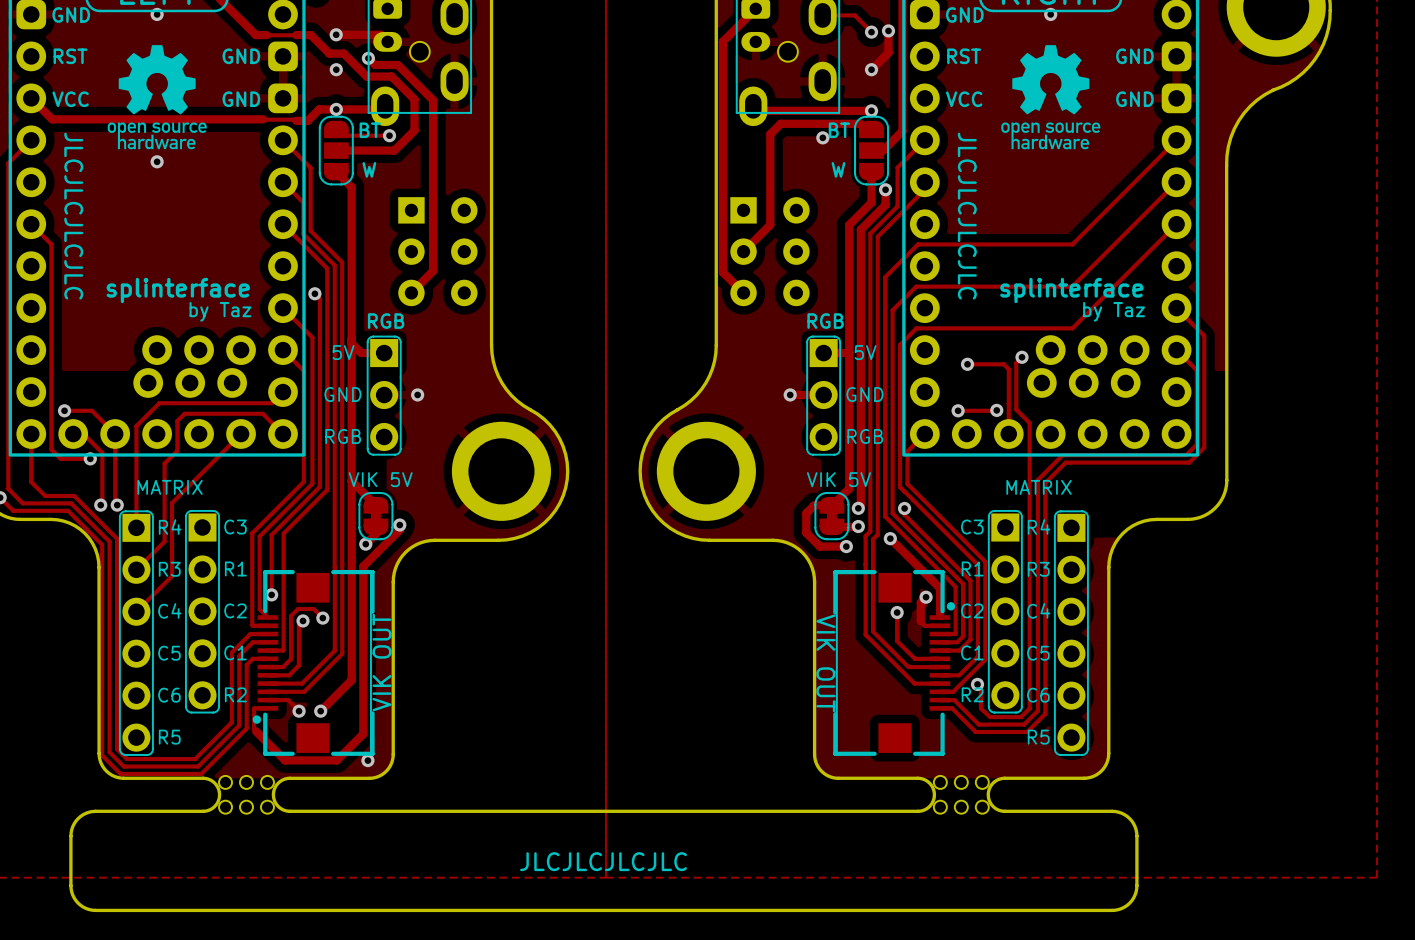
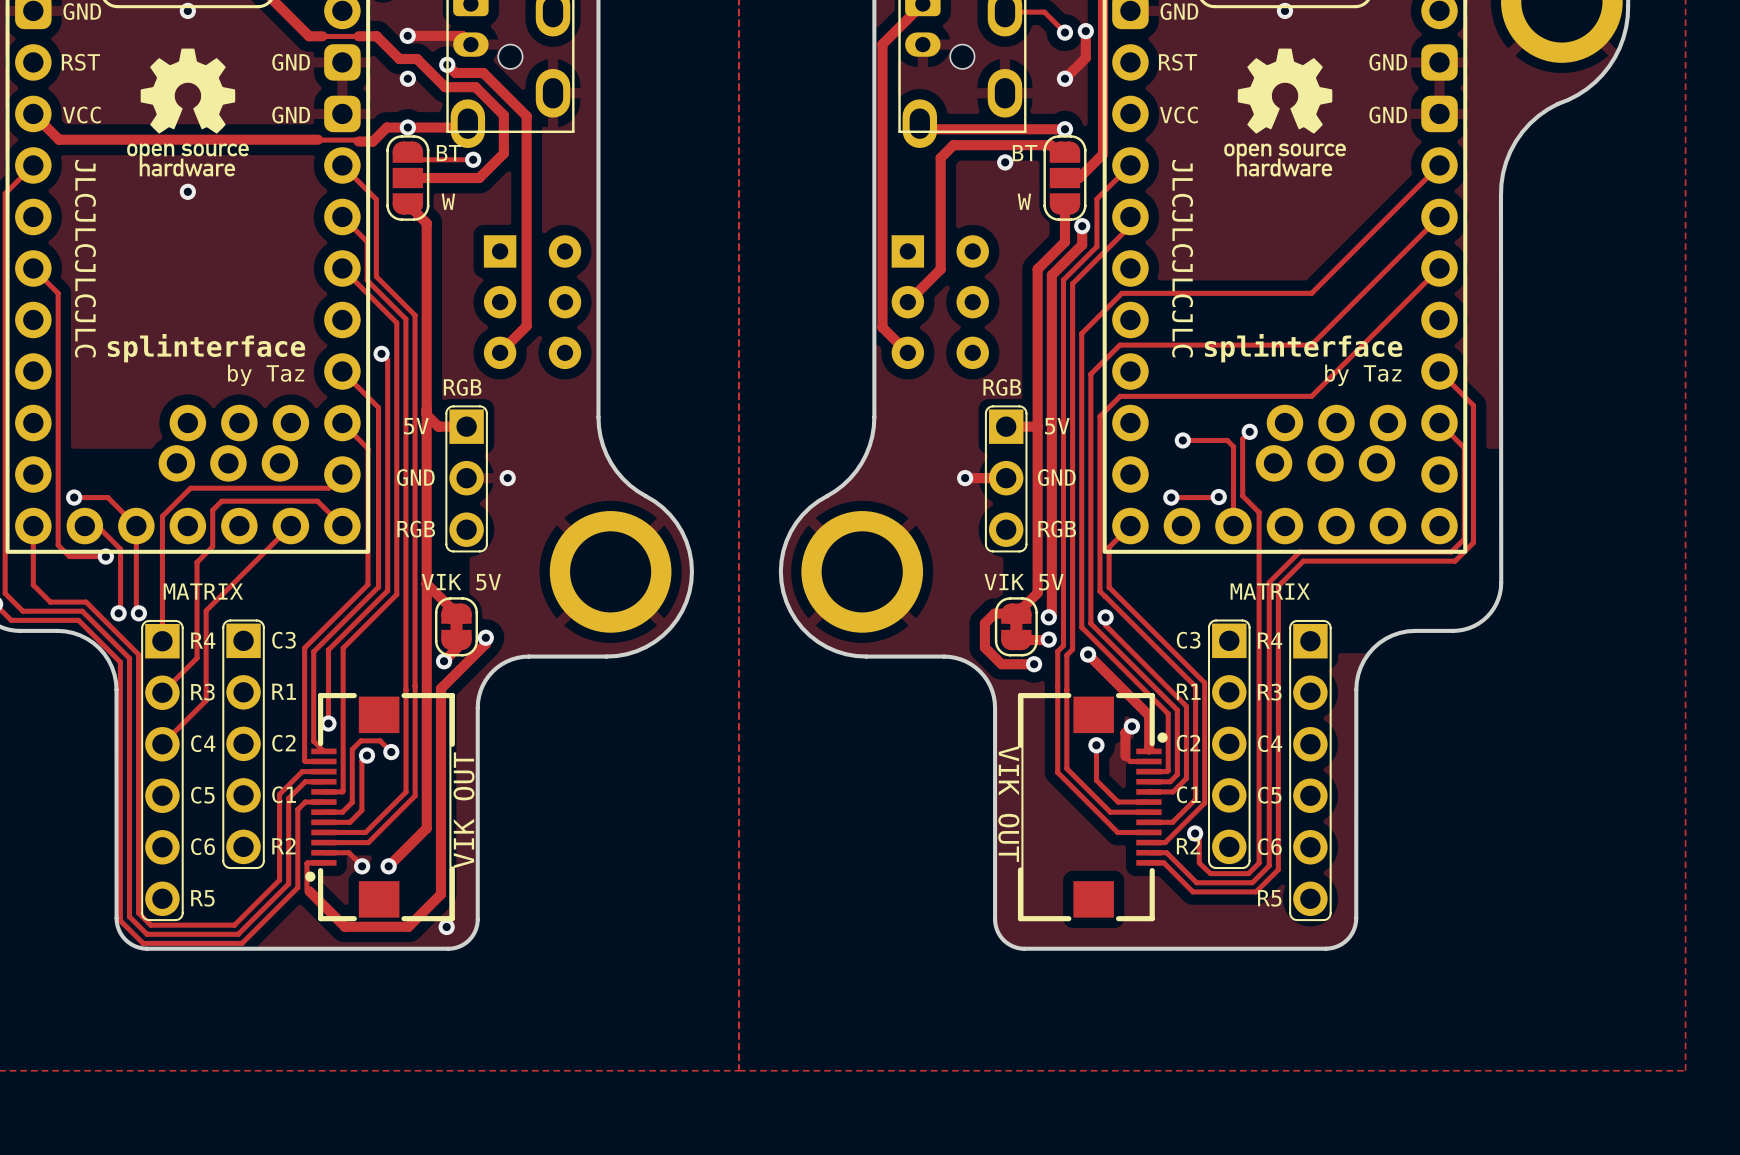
board edge: (289, 778) (369, 778) -> (244, 948) (448, 948)
board edge: none -> (1121, 948) (1228, 948)
part: (246, 794) -> none
part: (961, 794) -> none
board edge: (203, 811) (95, 811) (80, 816) (74, 823) (70, 836) (71, 888) (76, 900) (86, 908) (95, 910) (1112, 910) (1121, 908) (1131, 900) (1136, 888) (1136, 836) (1133, 823) (1127, 816) (1112, 811) (1004, 811) -> none
board edge: (289, 811) (917, 811) -> none
text: JLCJLCJLCJLC (603, 861) -> none

